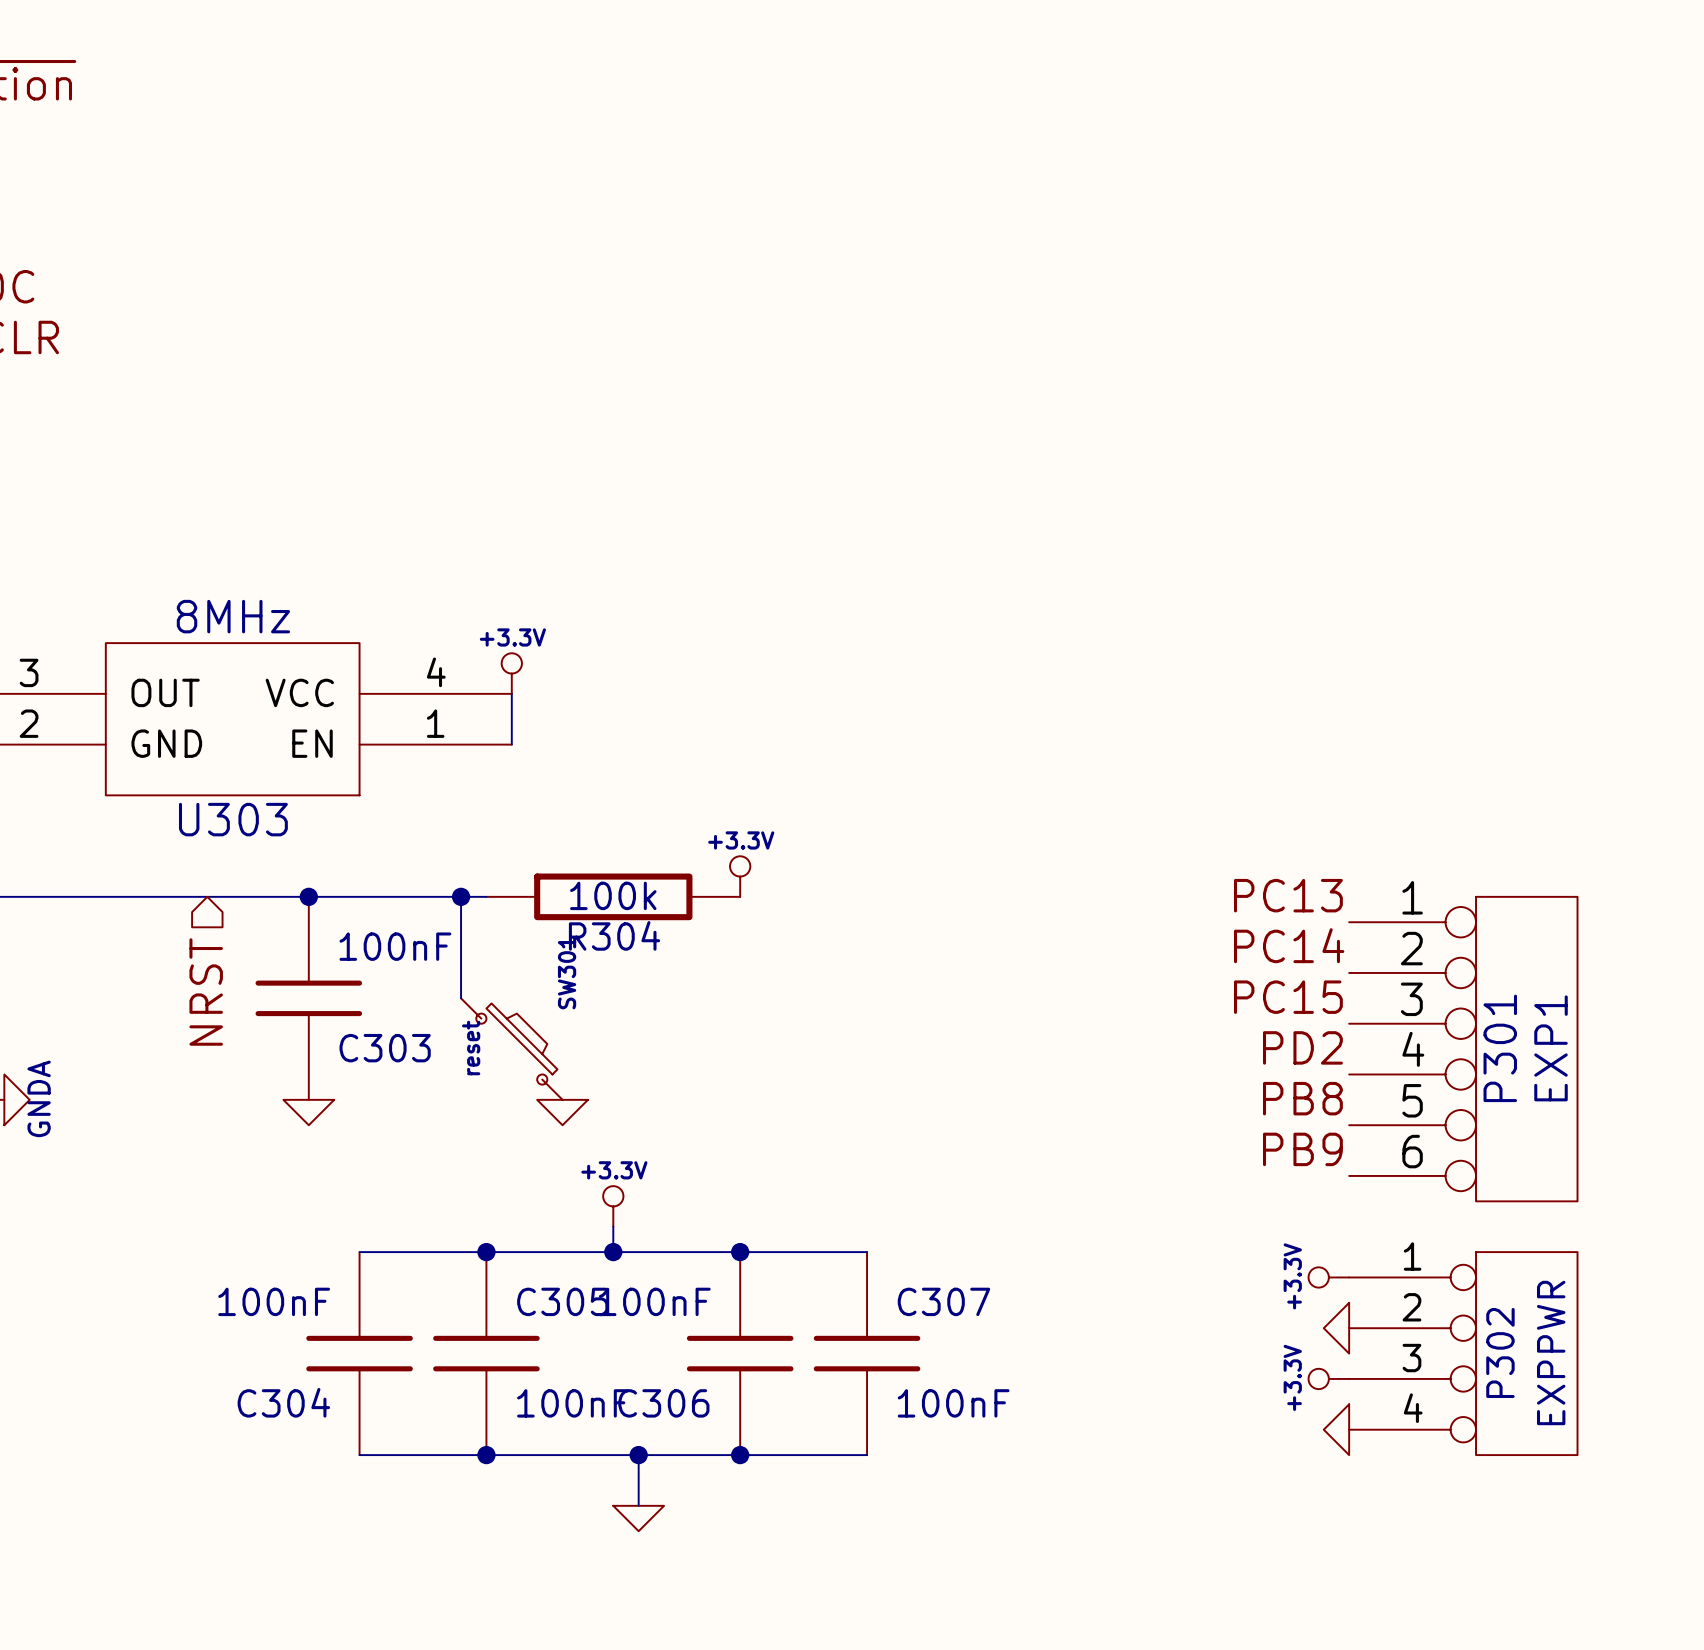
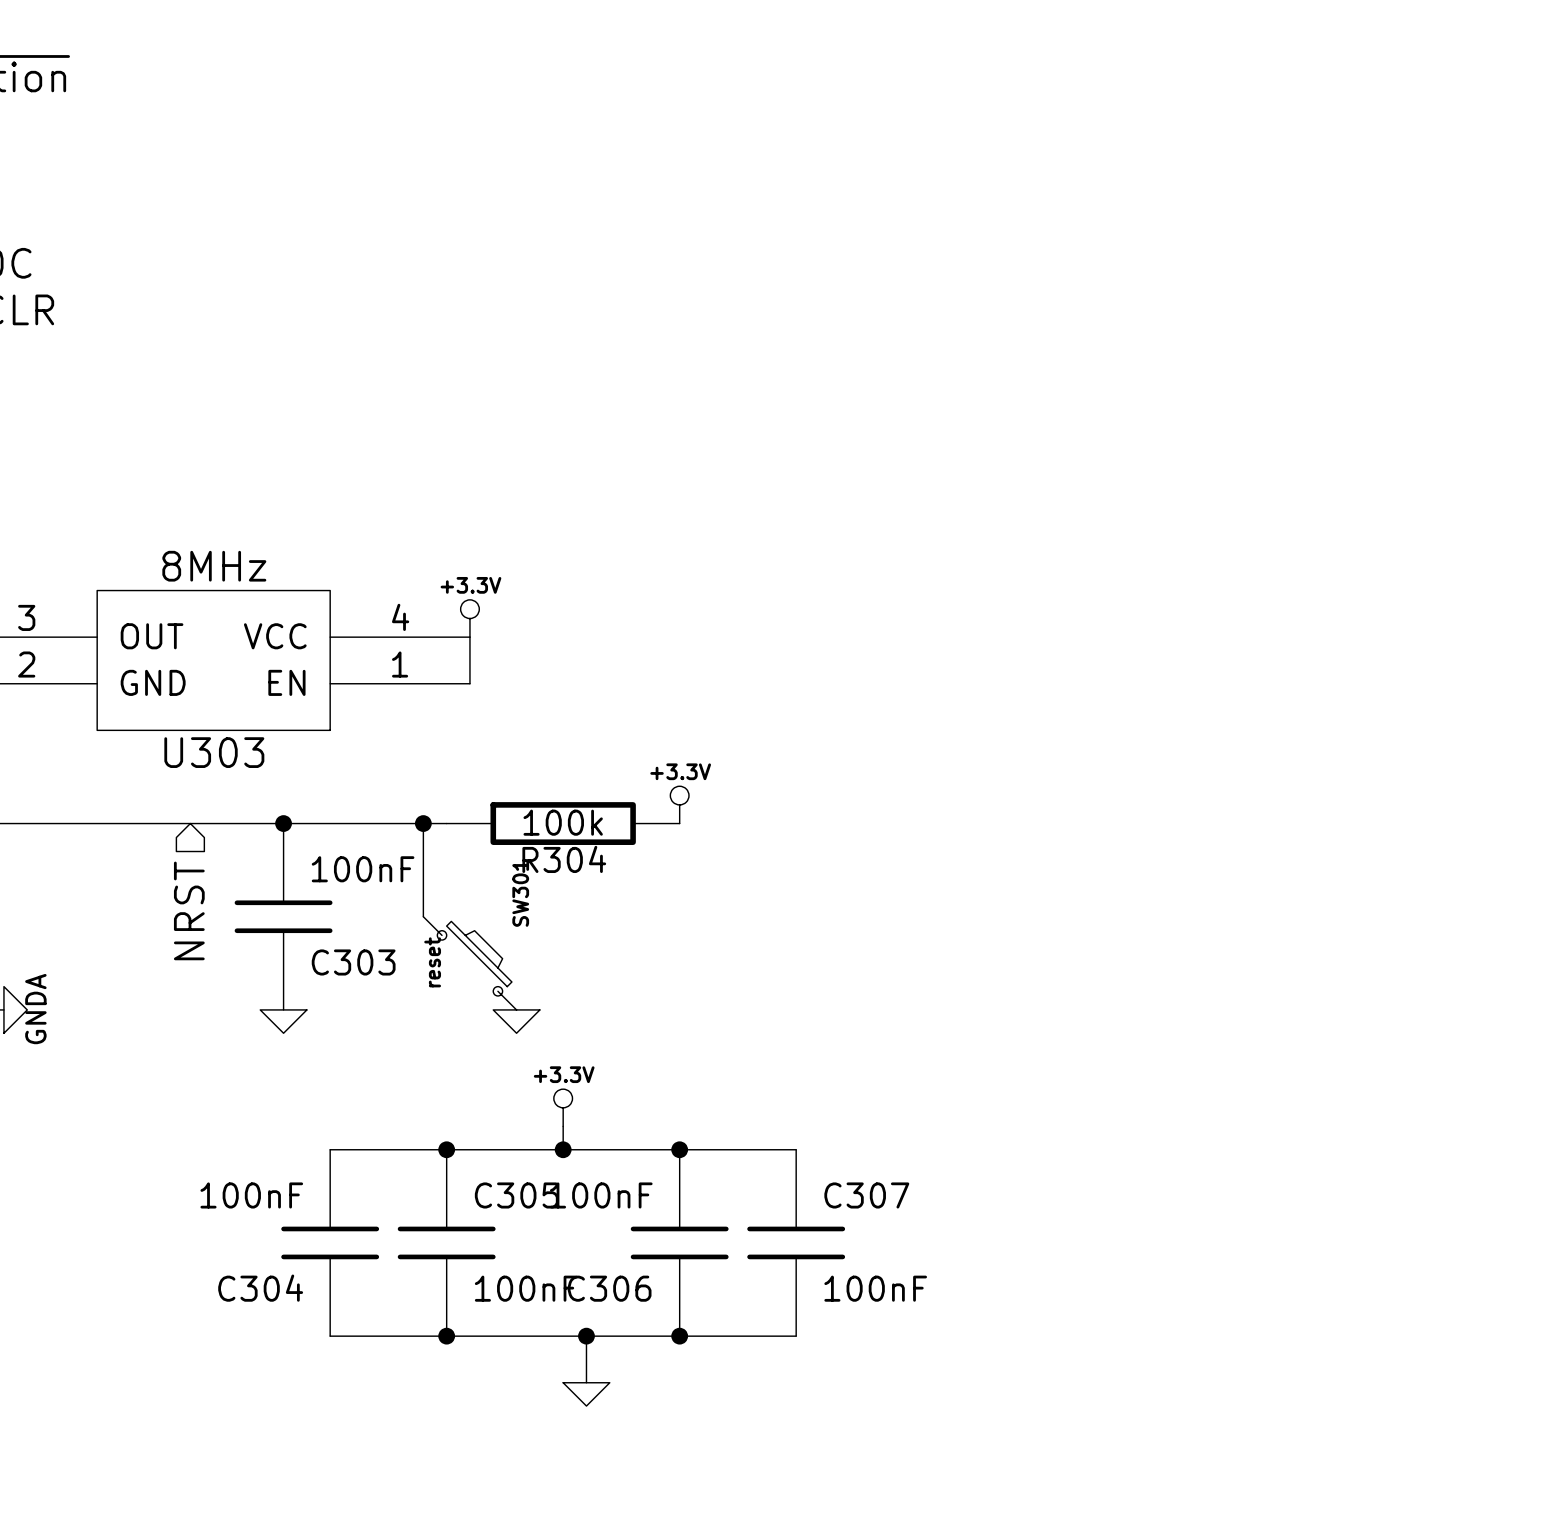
label: PC13 (1288, 895) -> none
label: PC14 (1289, 945) -> none
label: PC15 (1288, 997) -> none
label: PD2 (1302, 1047) -> none
P301: EXP1 (1463, 1049) -> none
label: PB8 (1302, 1098) -> none
label: PB9 (1302, 1149) -> none
power symbol: +3.3V (1328, 1277) -> none
power symbol: (1336, 1328) -> none
P302: EXPPWR (1463, 1353) -> none
power symbol: +3.3V (1328, 1378) -> none
power symbol: (1336, 1429) -> none

